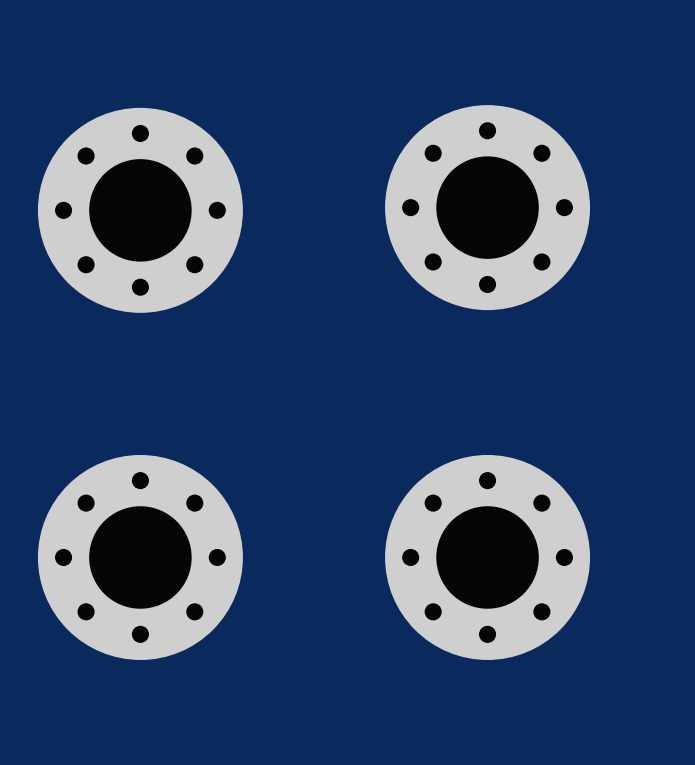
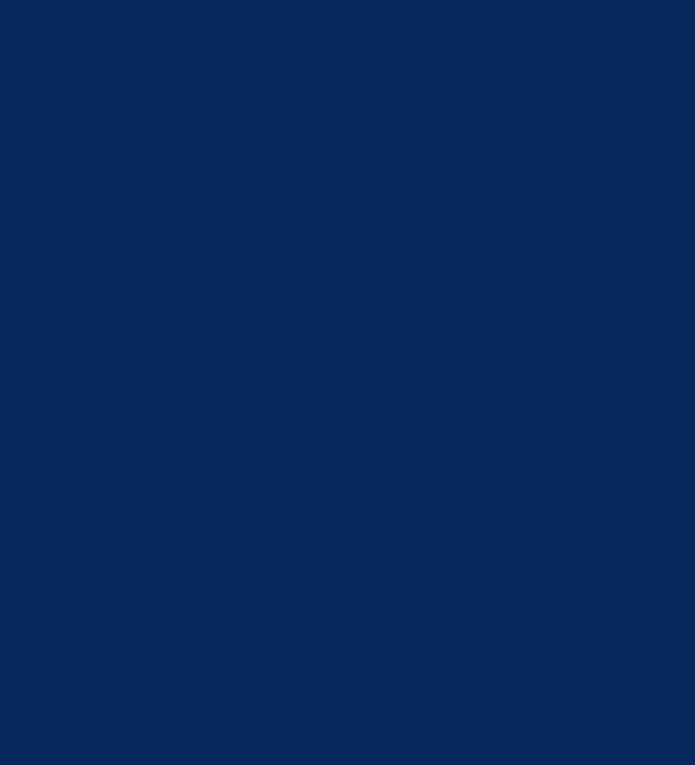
part: (487, 207) -> none
part: (140, 210) -> none
part: (140, 557) -> none
part: (487, 557) -> none

